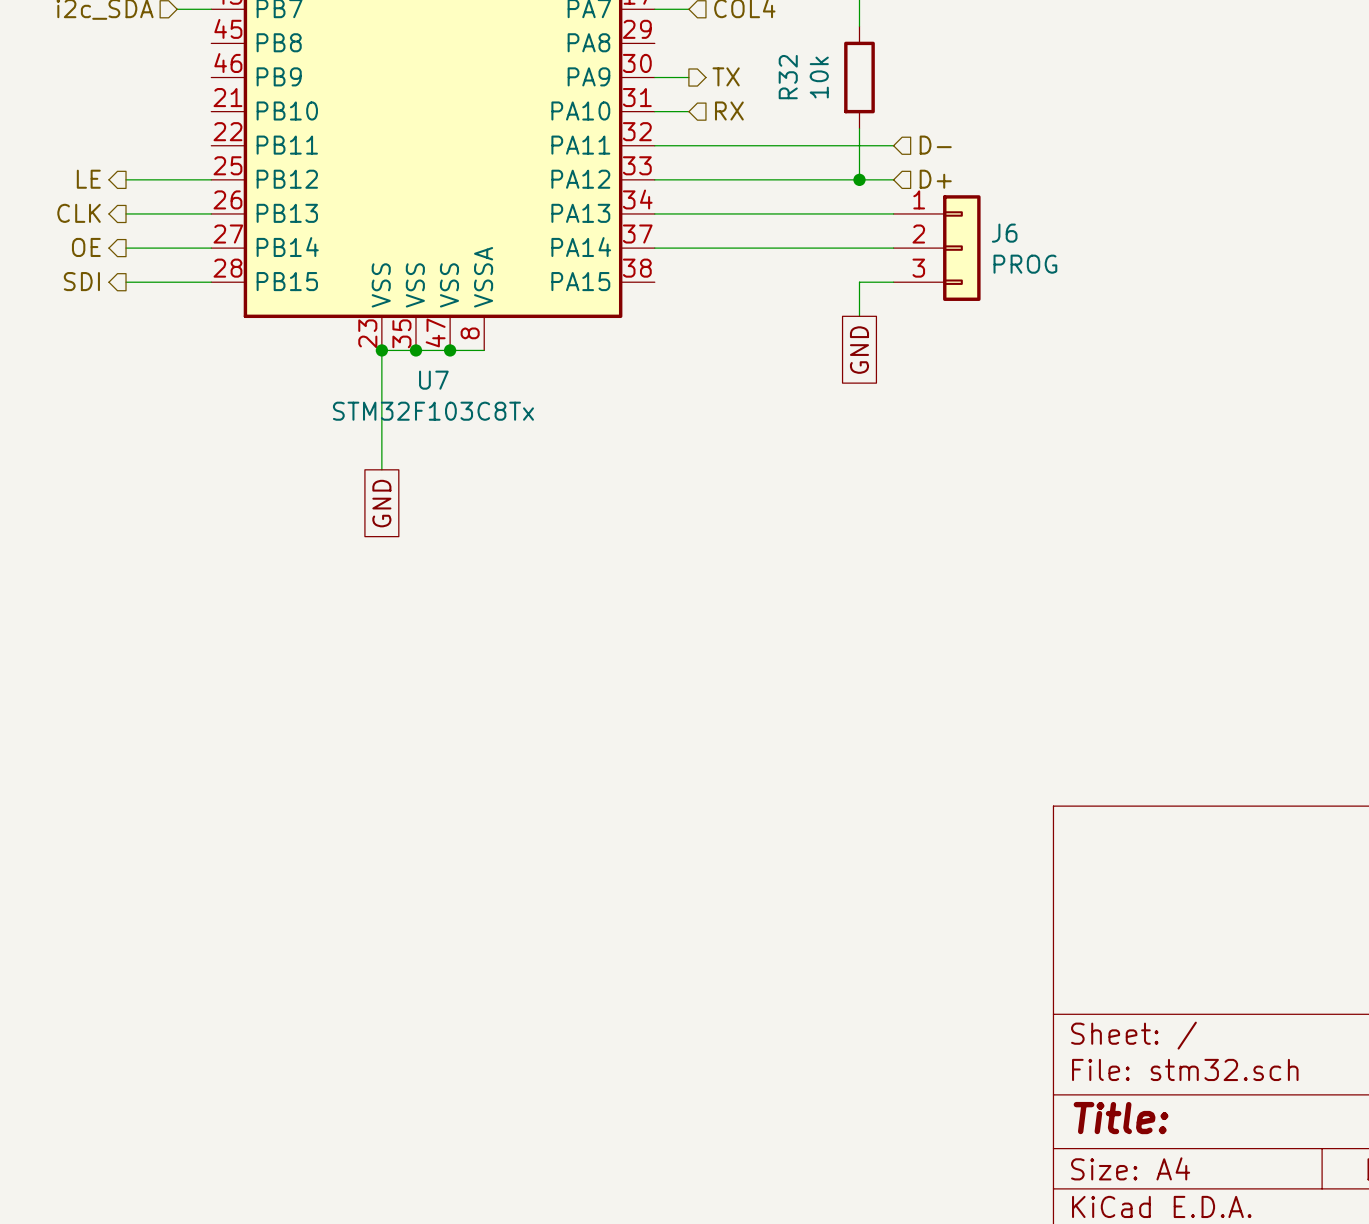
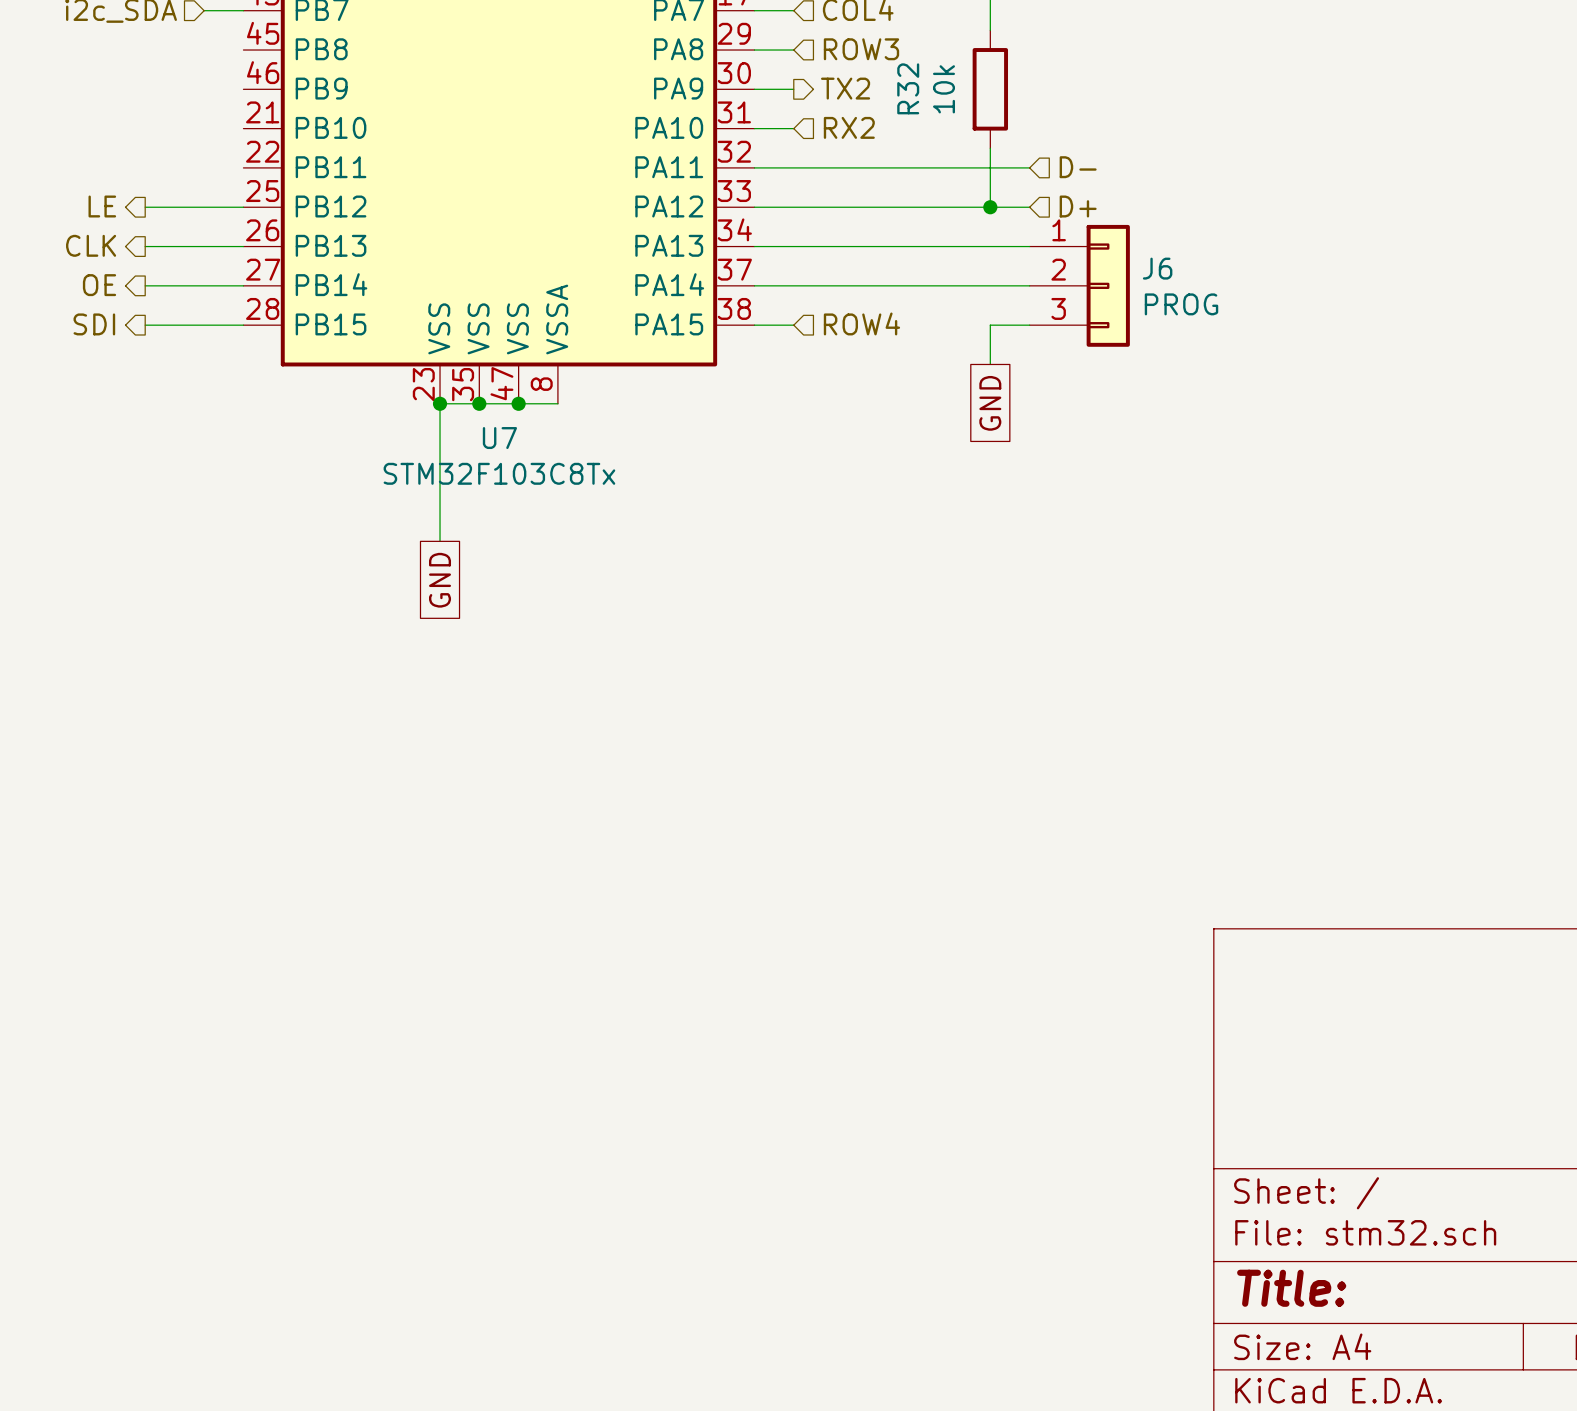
hierarchical label: none -> ROW3 (861, 49)
wire: none -> (754, 50) (793, 50)
hierarchical label: TX (726, 76) -> TX2 (845, 88)
hierarchical label: RX (729, 110) -> RX2 (849, 127)
hierarchical label: none -> ROW4 (861, 323)
wire: none -> (754, 325) (793, 325)

